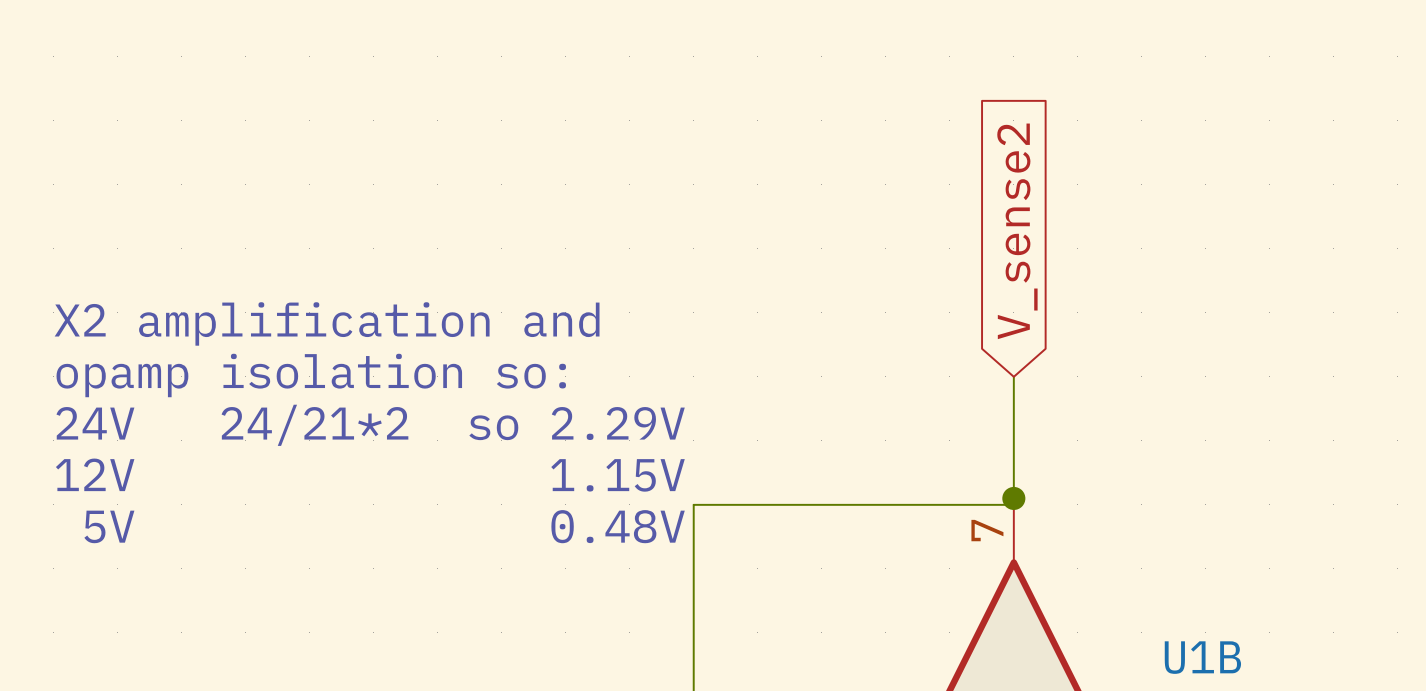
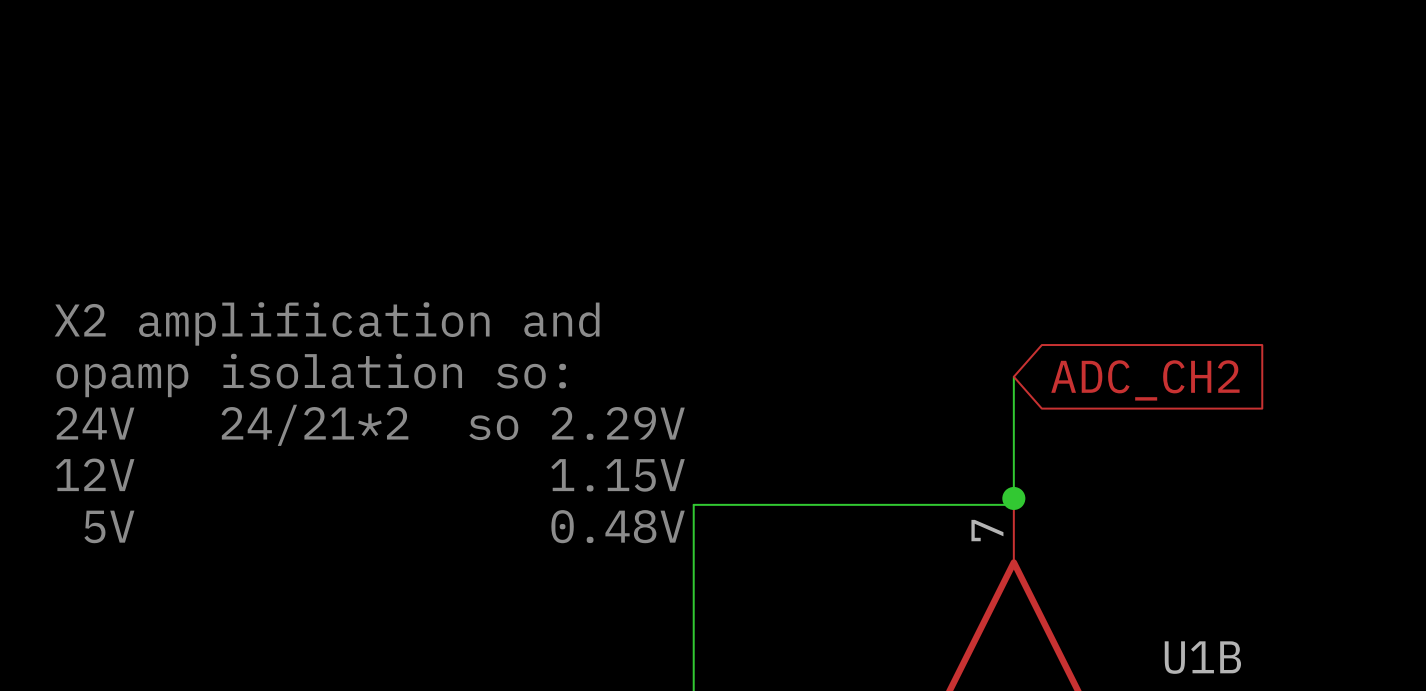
global label: V_sense2 (1017, 231) -> ADC_CH2 (1145, 380)

